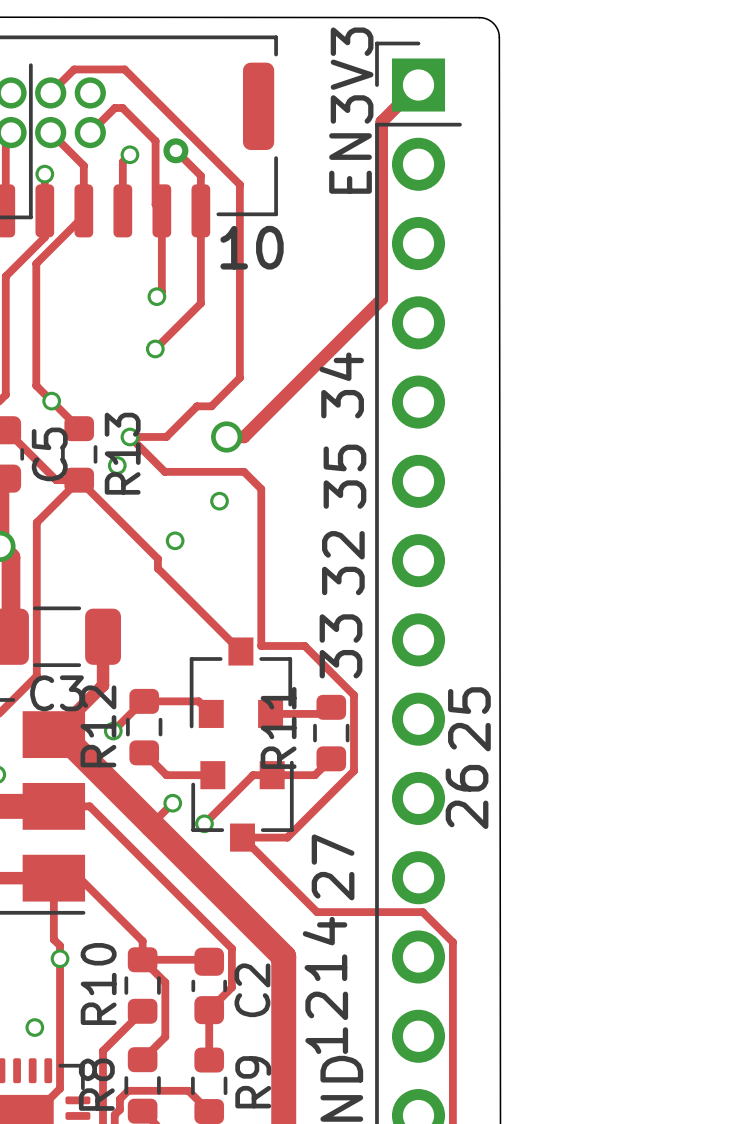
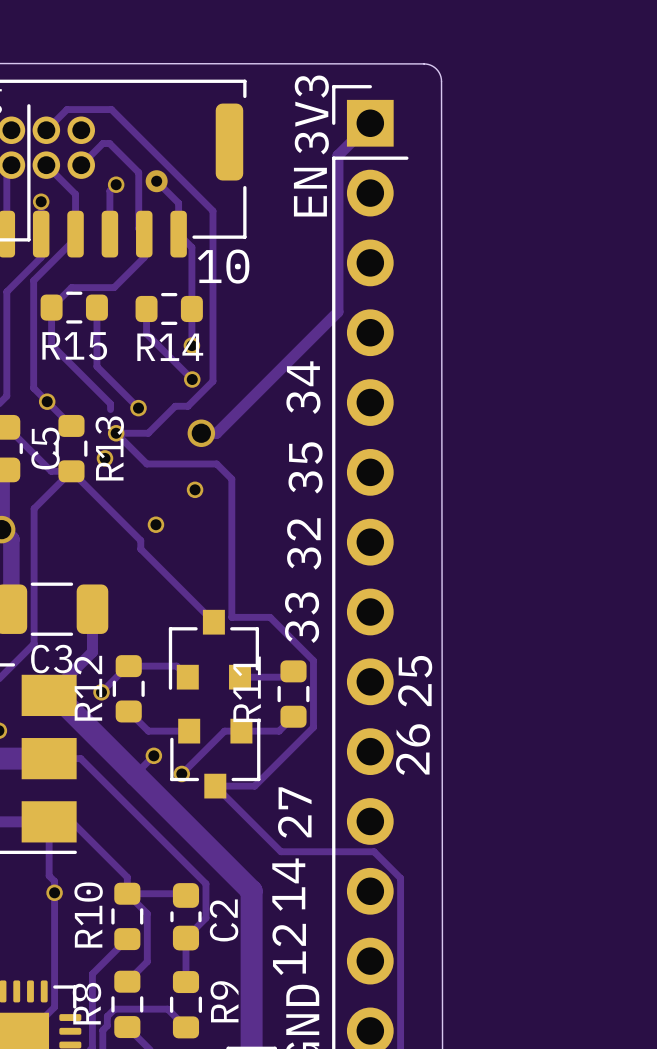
track: (200, 210) (200, 303) (155, 348) -> (178, 234) (191, 247) (191, 345)
track: (161, 237) (161, 291) (156, 296) -> (144, 257) (114, 287) (71, 287) (51, 307) (51, 344) (110, 403) (110, 409)
R15: none -> (74, 307)
track: none -> (96, 307) (96, 366) (138, 408)
track: none -> (146, 308) (146, 333) (192, 380)
R14: none -> (169, 308)
via: (156, 296) -> none
via: none -> (191, 345)
via: (155, 348) -> none
via: none -> (192, 379)
via: none -> (138, 408)
via: (34, 1027) -> none

